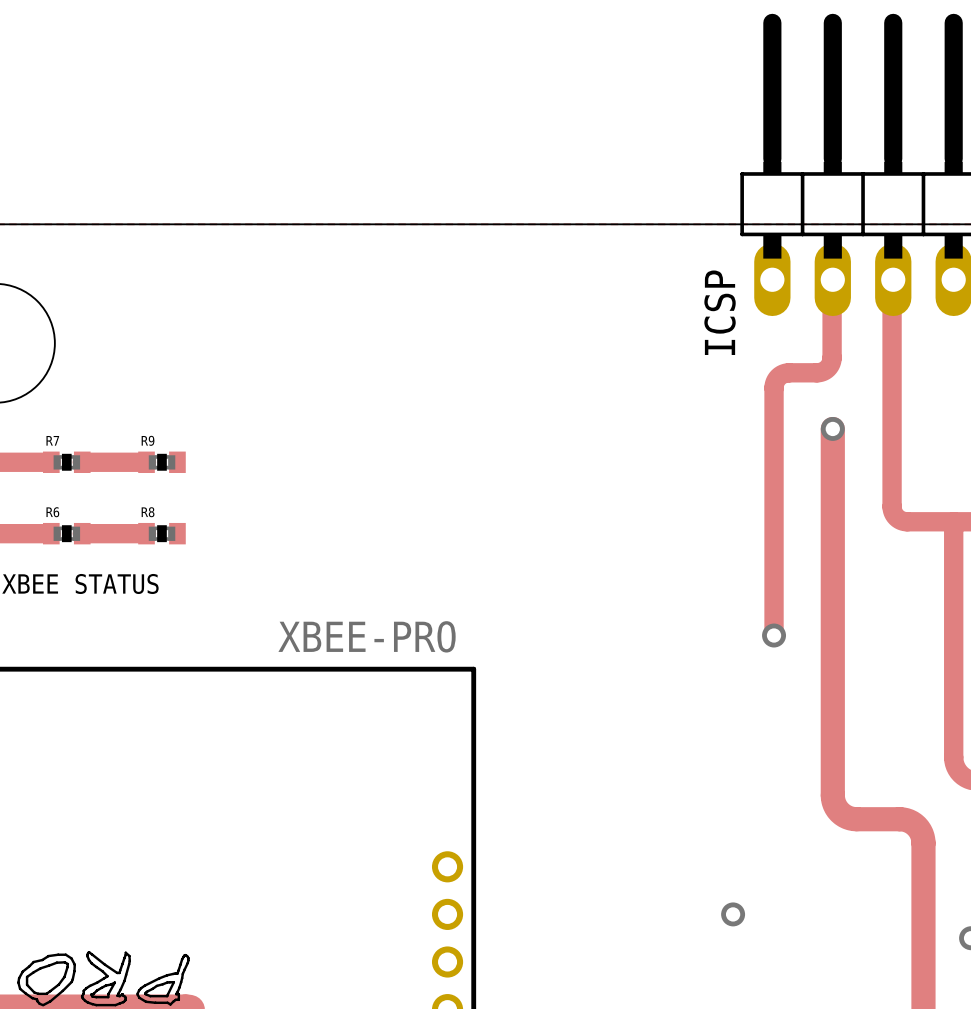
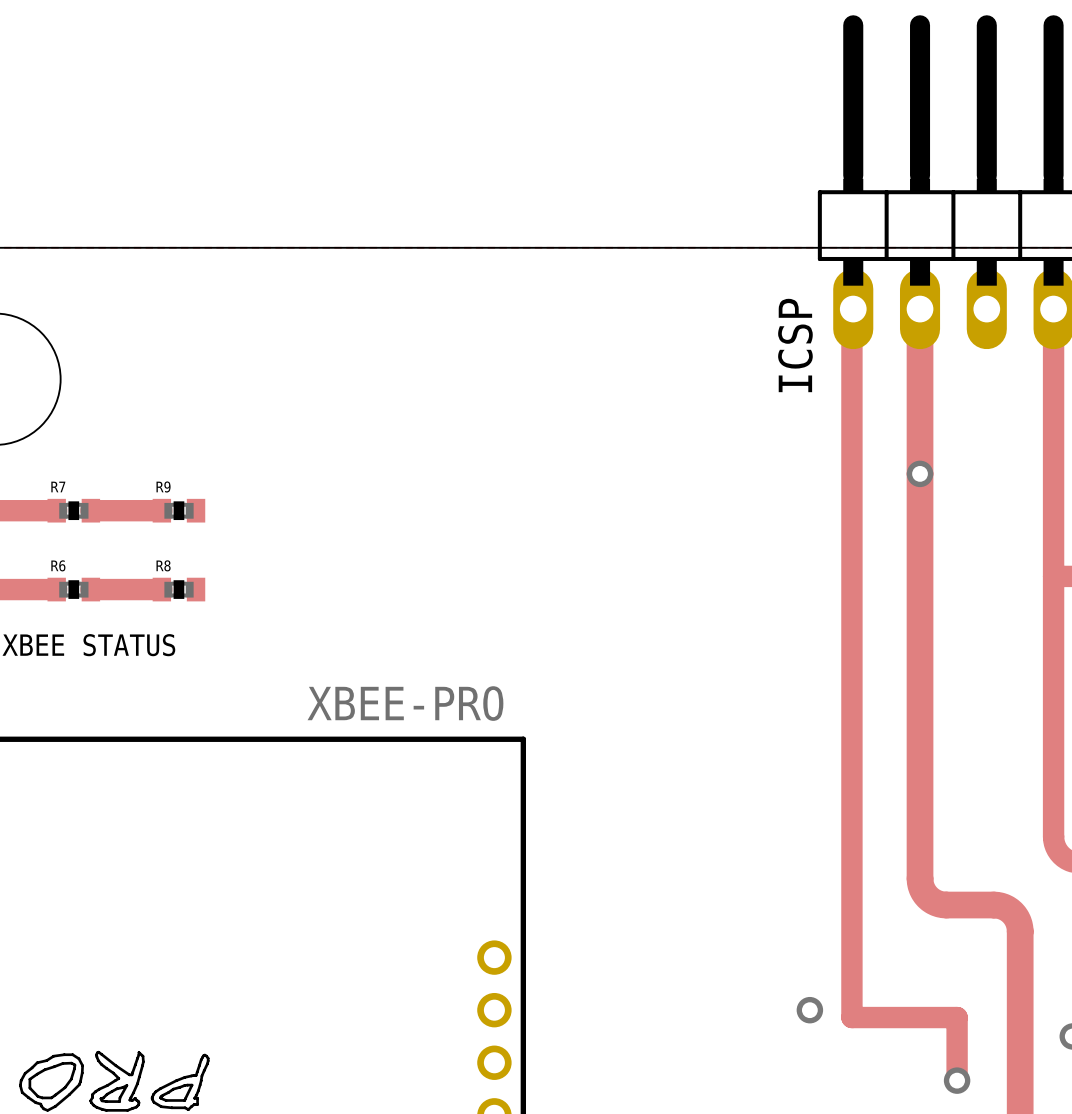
track: none -> (853, 309) (851, 1017) (957, 1017) (957, 1080)
track: (832, 279) (832, 357) (830, 365) (824, 370) (818, 372) (783, 373) (777, 378) (774, 385) (774, 635) -> (920, 309) (920, 473)
track: (893, 279) (892, 510) (897, 518) (905, 521) (953, 521) -> (1053, 309) (1053, 576)
via: (774, 635) -> none
via: none -> (957, 1080)

